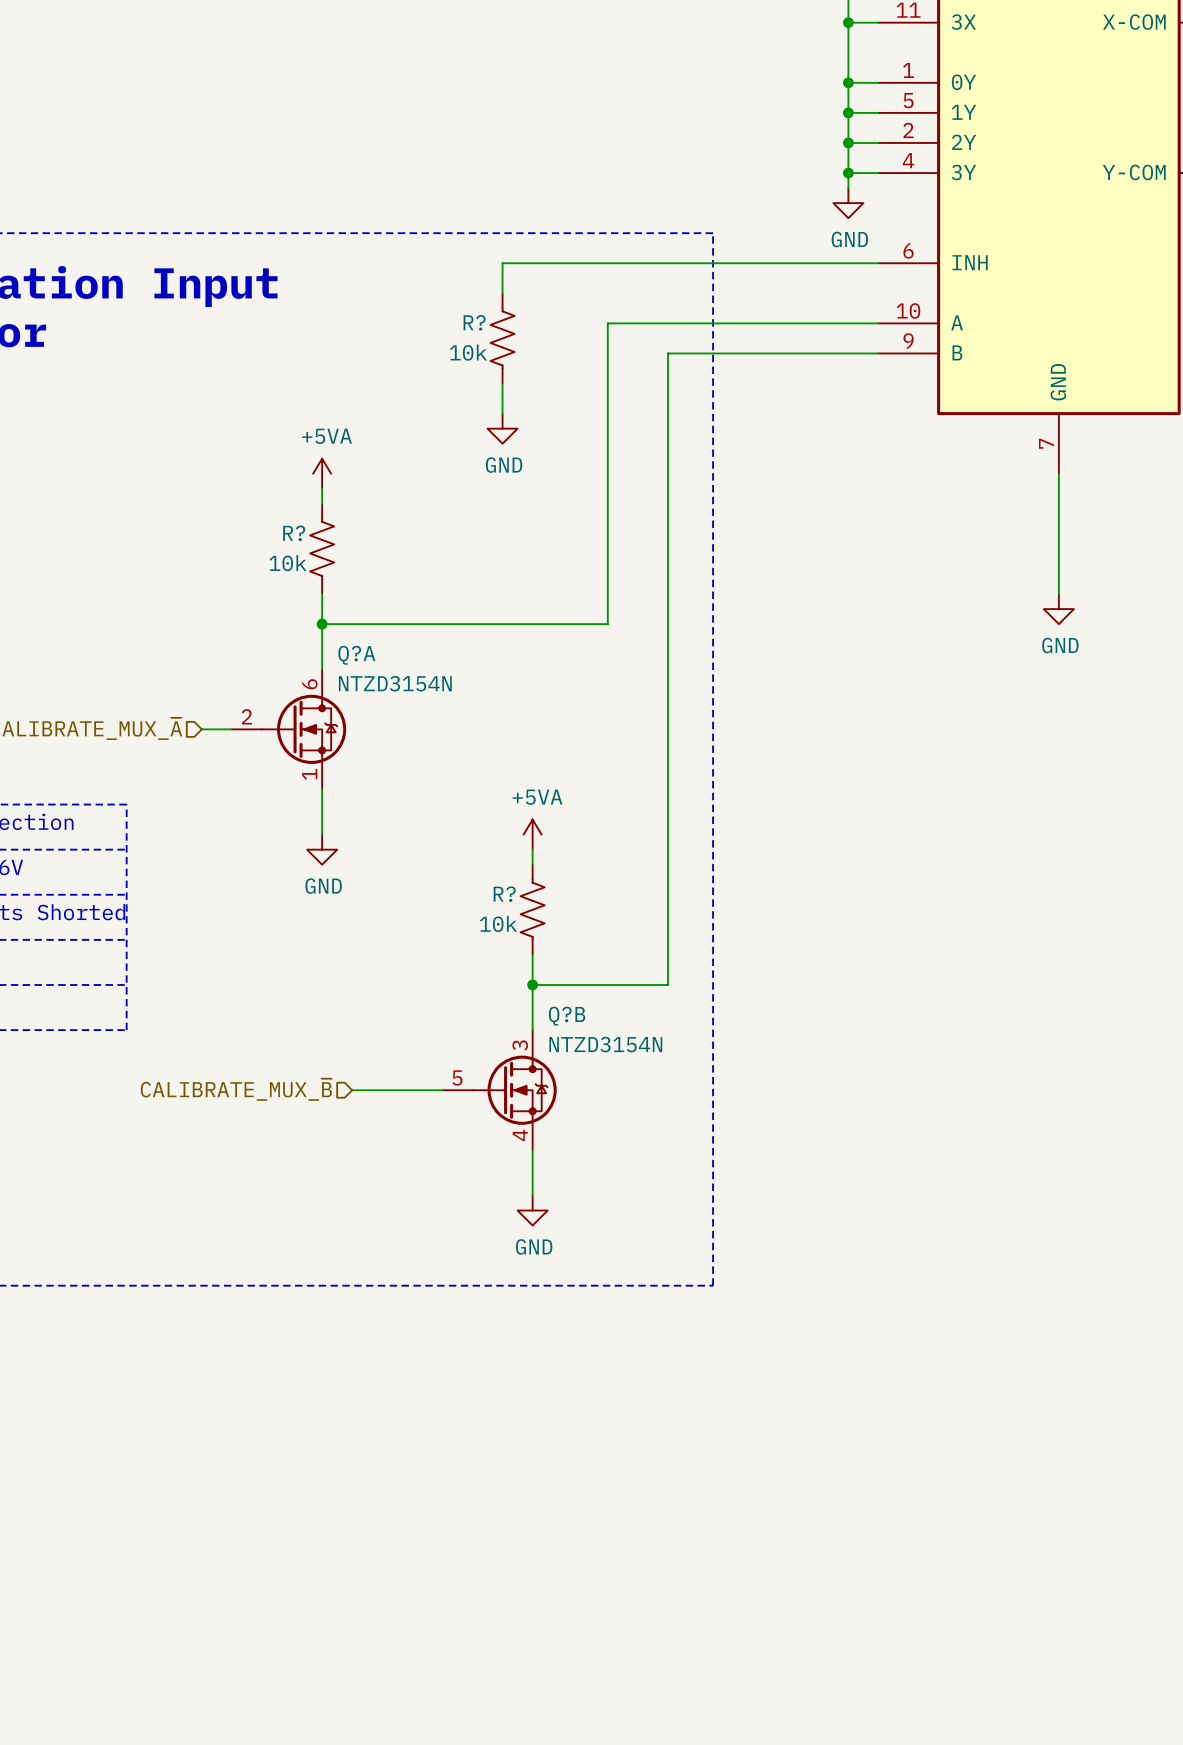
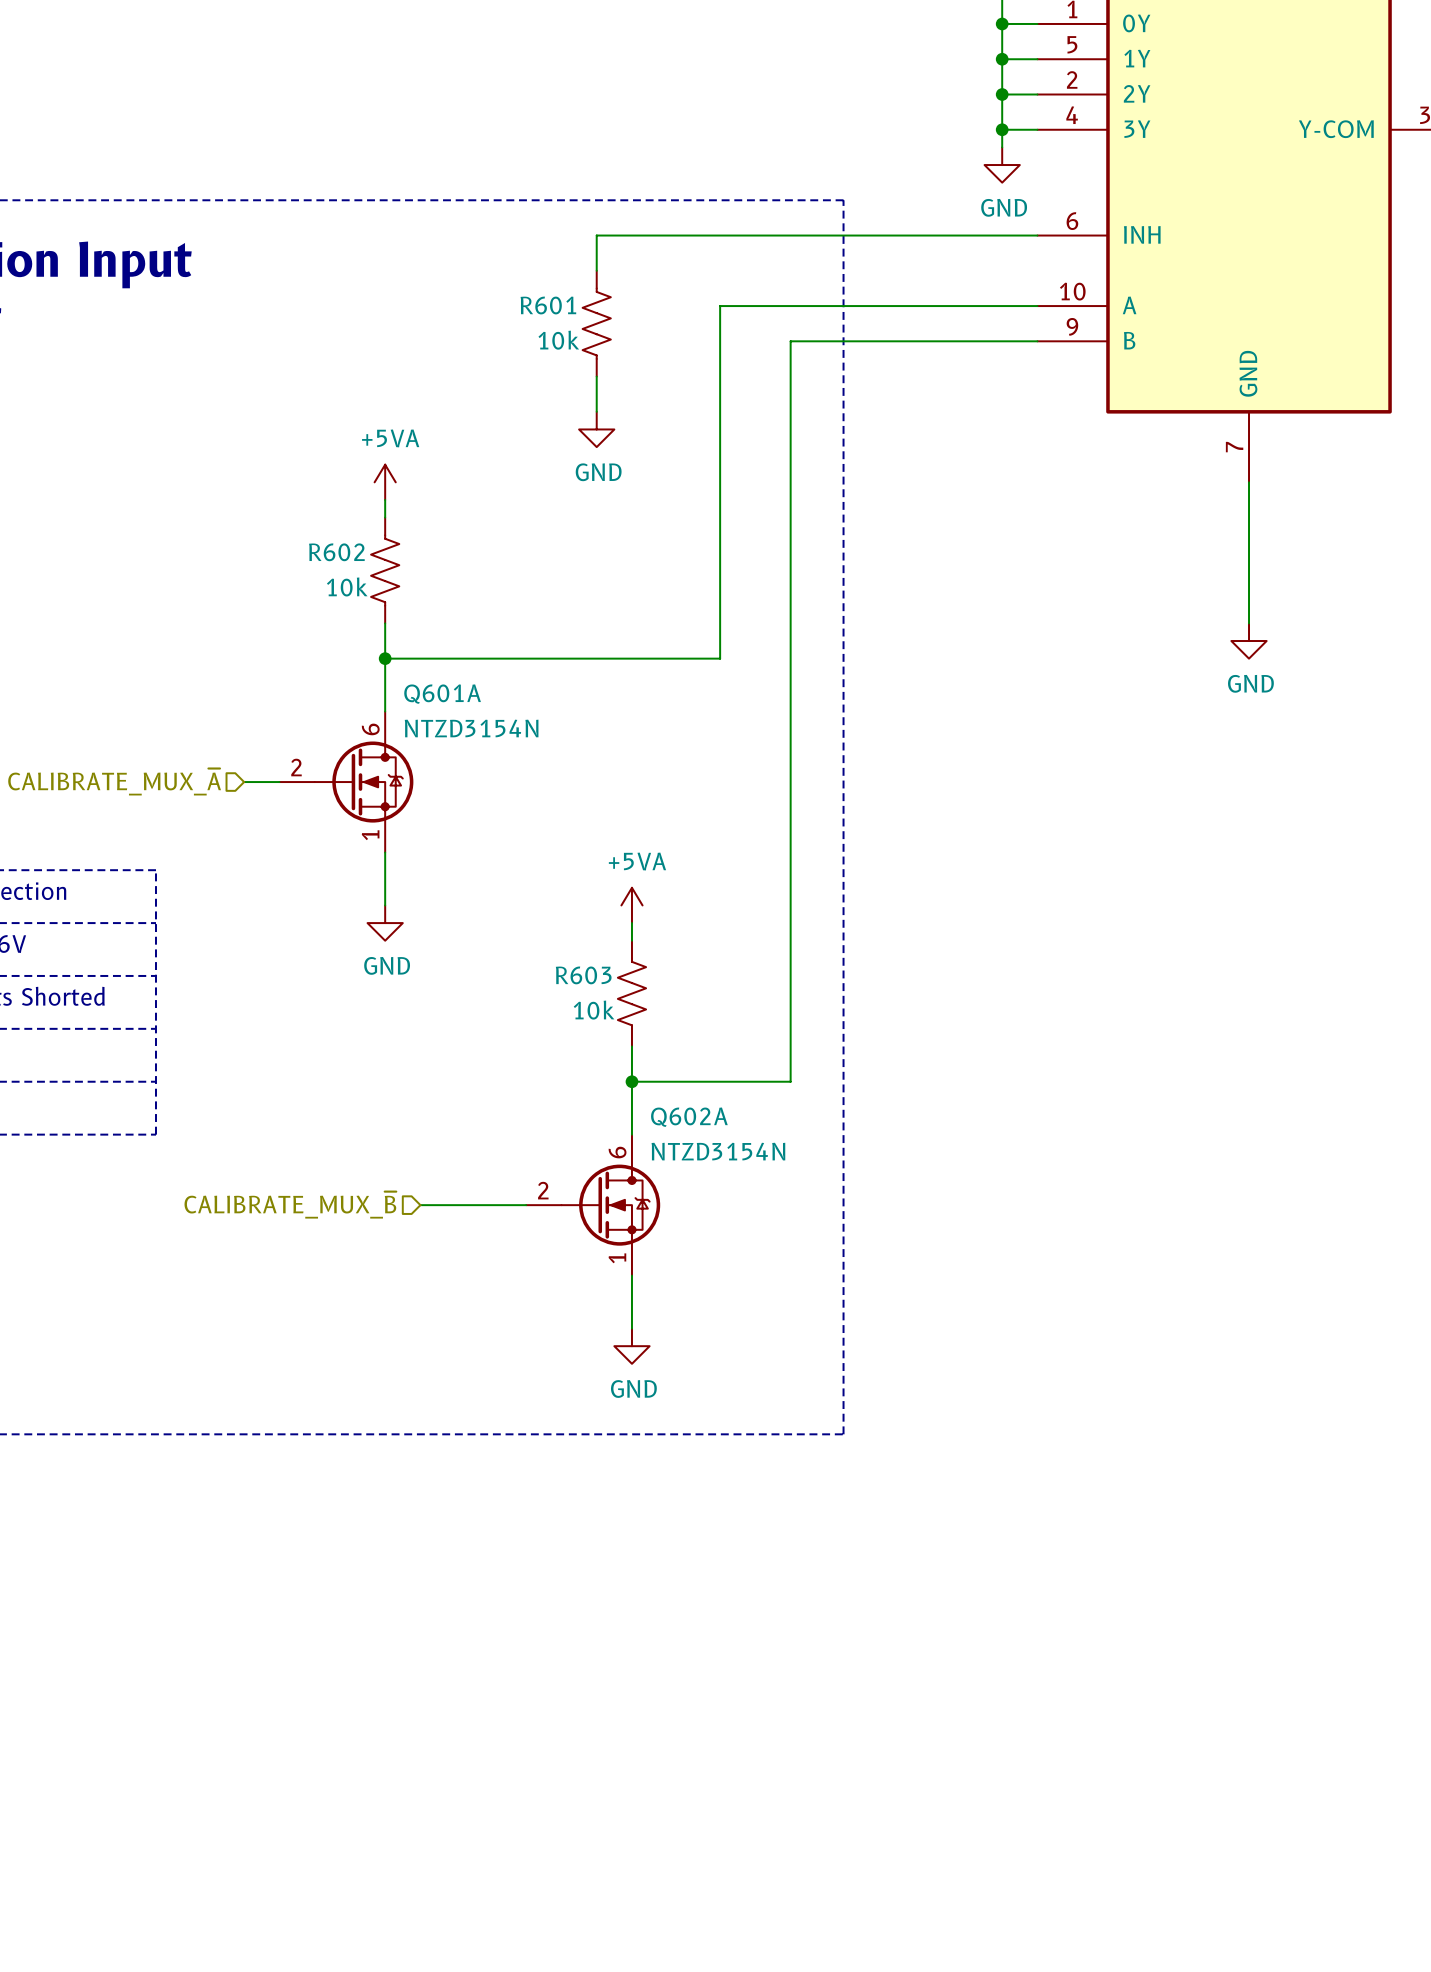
R? name: R? (474, 322) -> R601 (548, 305)
R? name: R? (294, 533) -> R602 (336, 552)
Q?A name: Q?A (356, 655) -> Q601A (442, 694)
R? name: R? (504, 894) -> R603 (583, 975)
Q?B name: Q?B (567, 1016) -> Q602A (689, 1117)
Q?B pin number: 3 (520, 1045) -> 6 (617, 1152)
Q?B pin number: 5 (457, 1077) -> 2 (543, 1190)
Q?B pin number: 4 (520, 1135) -> 1 (617, 1258)

